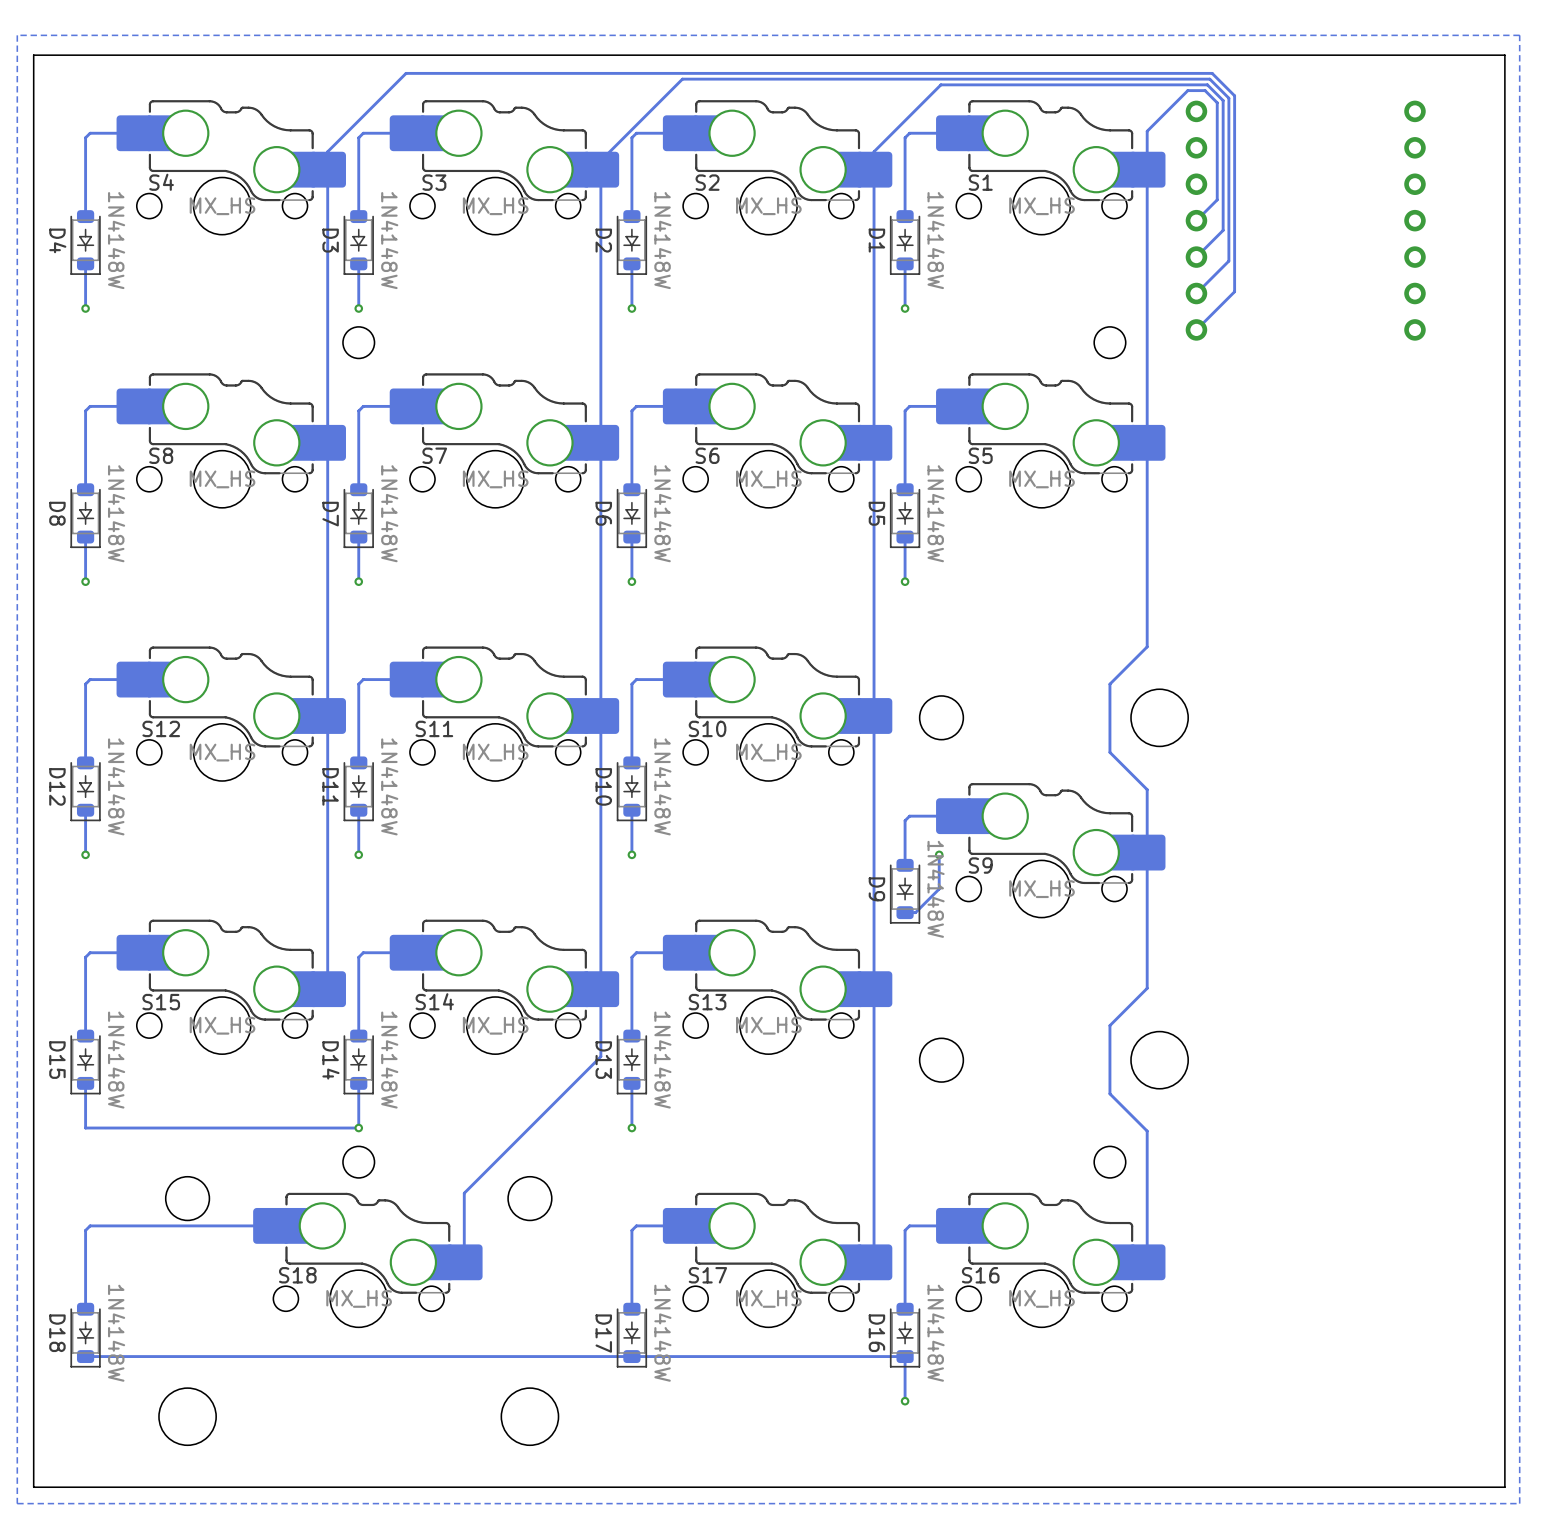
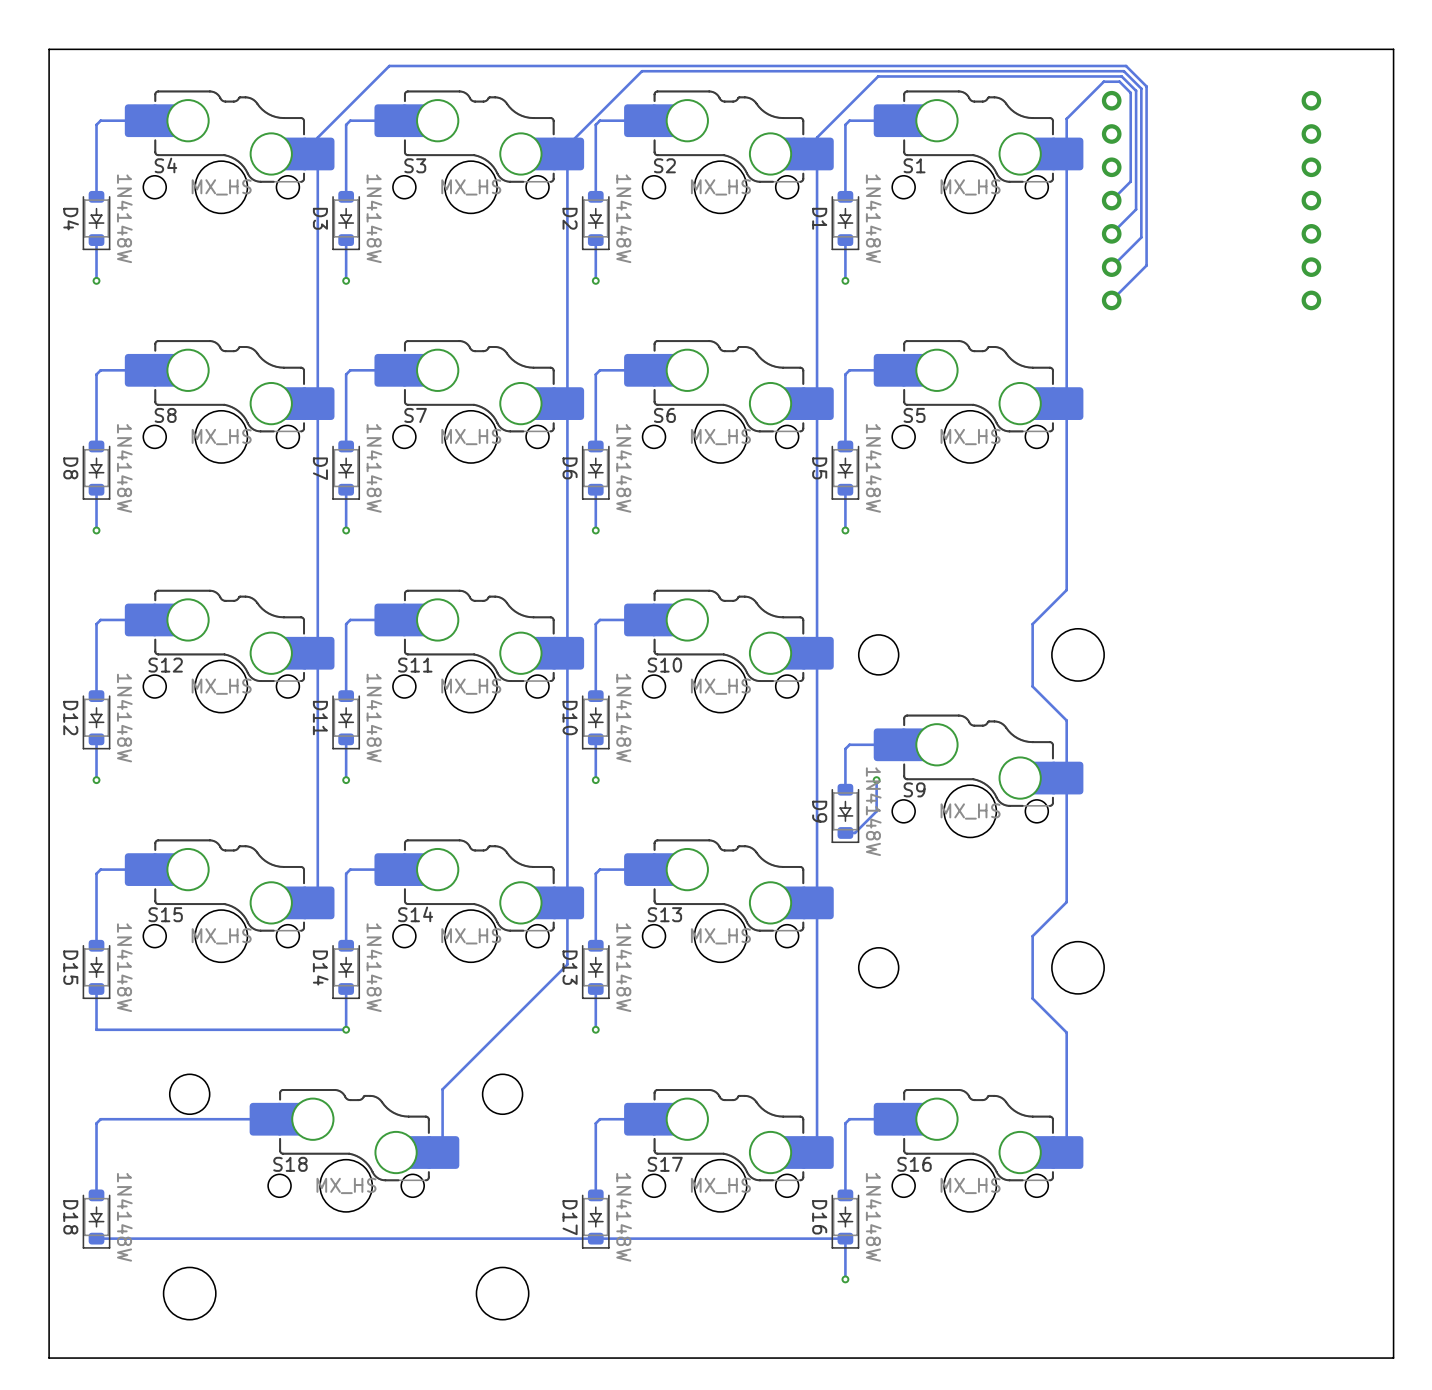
zone outline: (1519, 35) (17, 35) (17, 1503) (1519, 1503) (1519, 35) -> none
round board edge: [342, 326, 375, 359] -> none
round board edge: [1093, 326, 1127, 359] -> none
round board edge: [342, 1146, 375, 1179] -> none
round board edge: [1093, 1146, 1127, 1179] -> none

